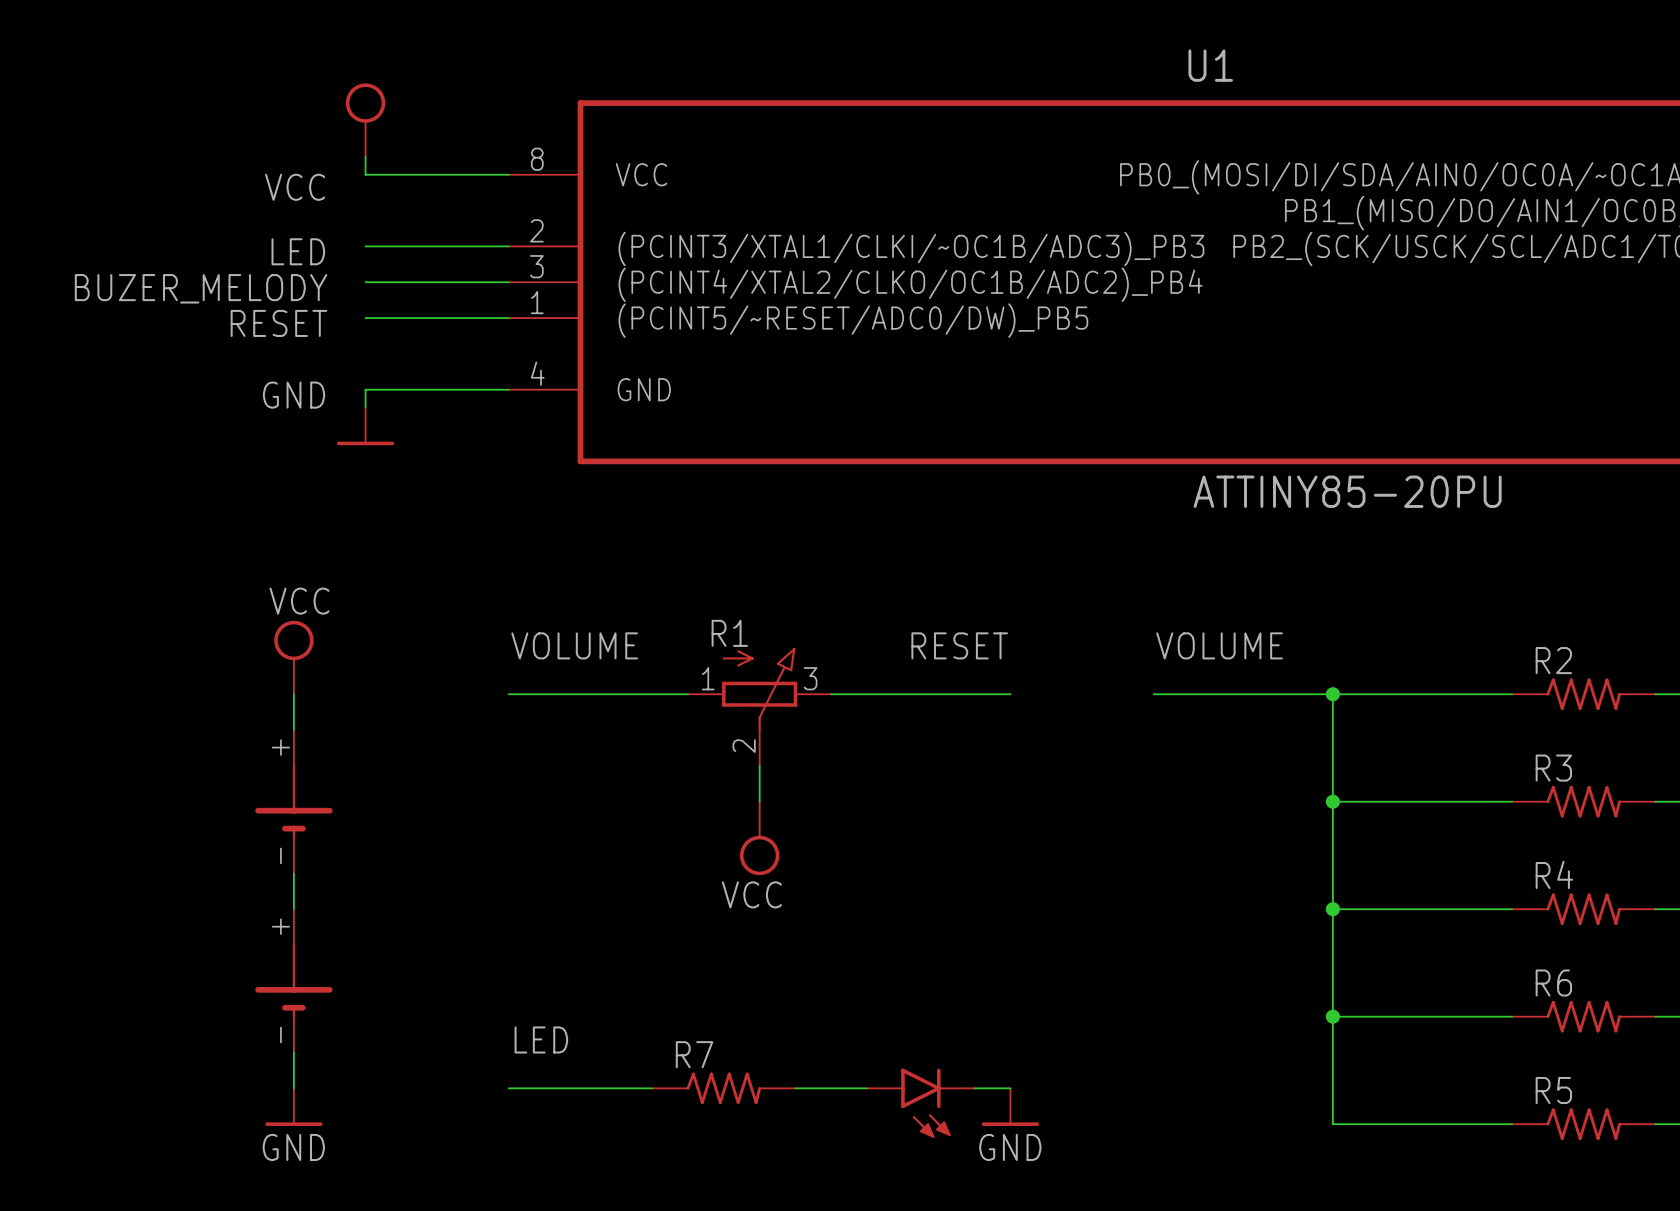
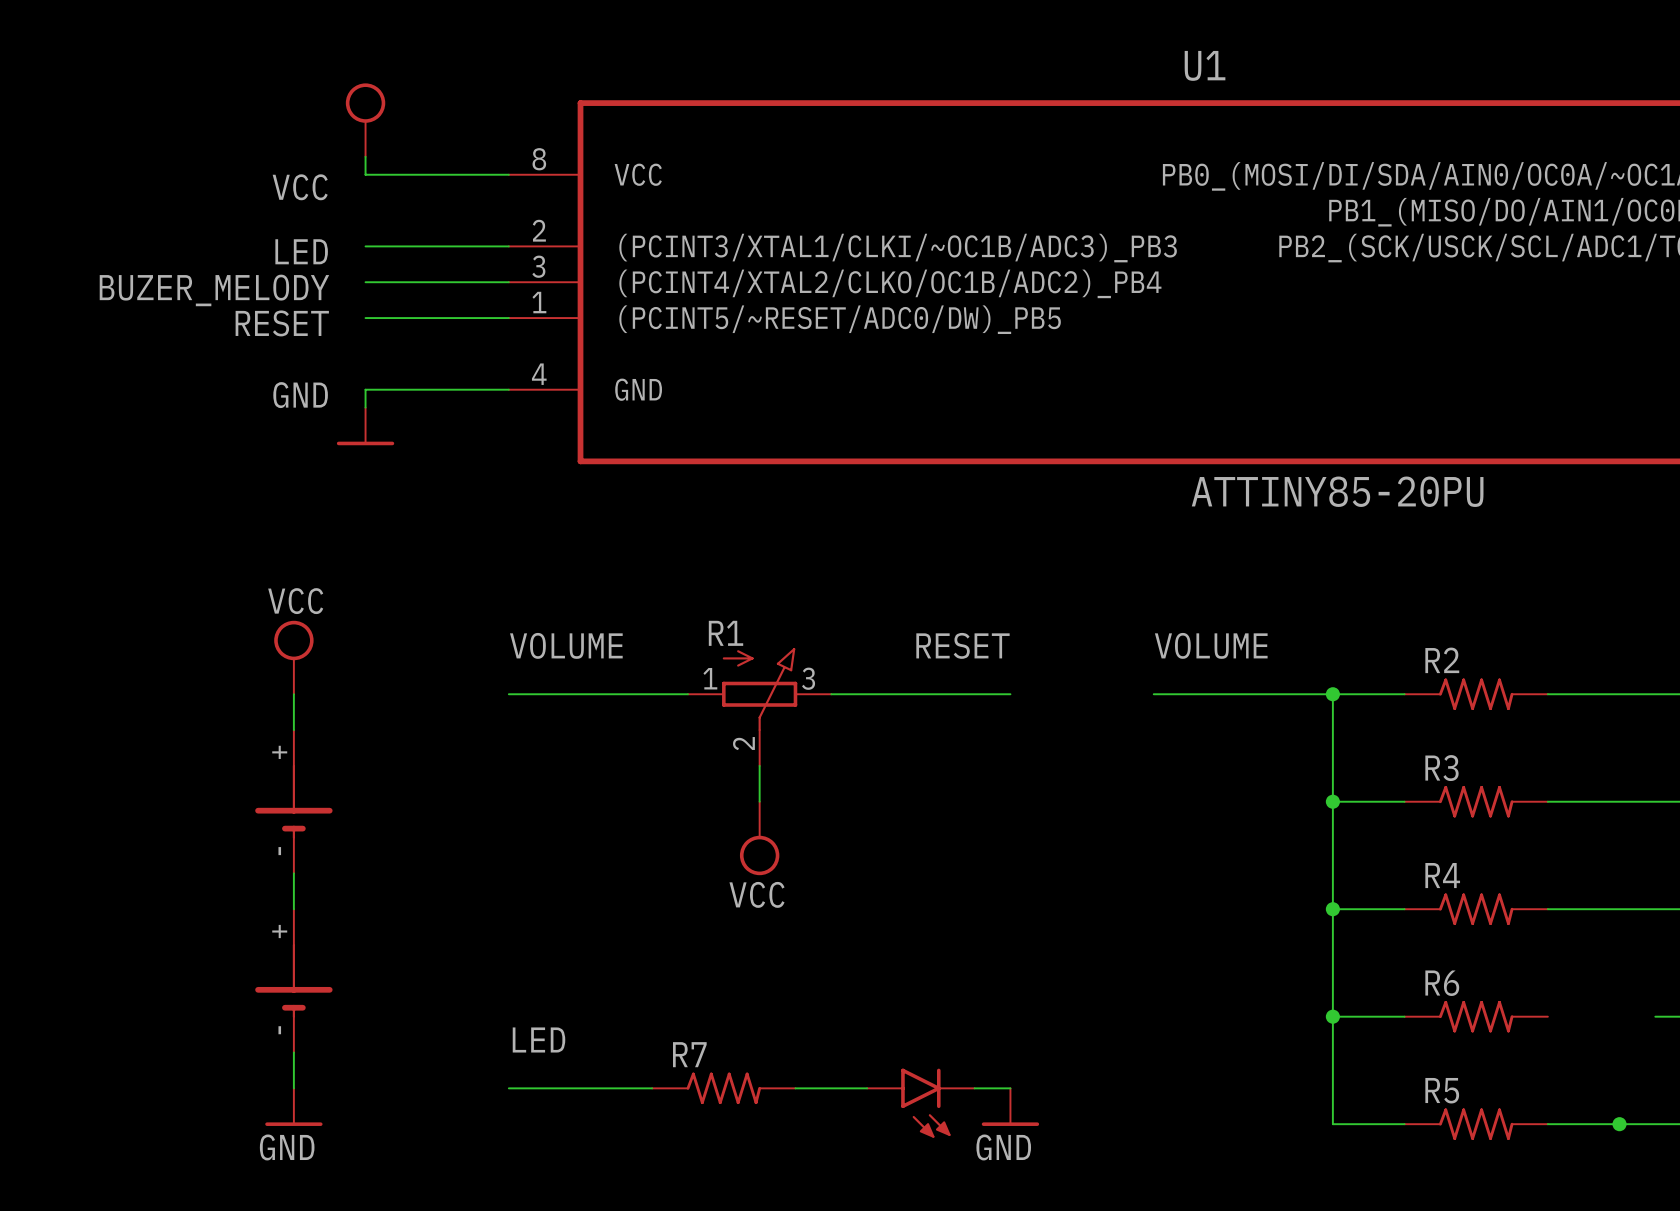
R2 position: (1583, 694) -> (1476, 694)
R3 position: (1583, 801) -> (1476, 801)
R4 position: (1583, 909) -> (1476, 909)
R6 position: (1583, 1016) -> (1476, 1016)
R5 position: (1583, 1124) -> (1476, 1124)
junction: none -> (1619, 1124)

